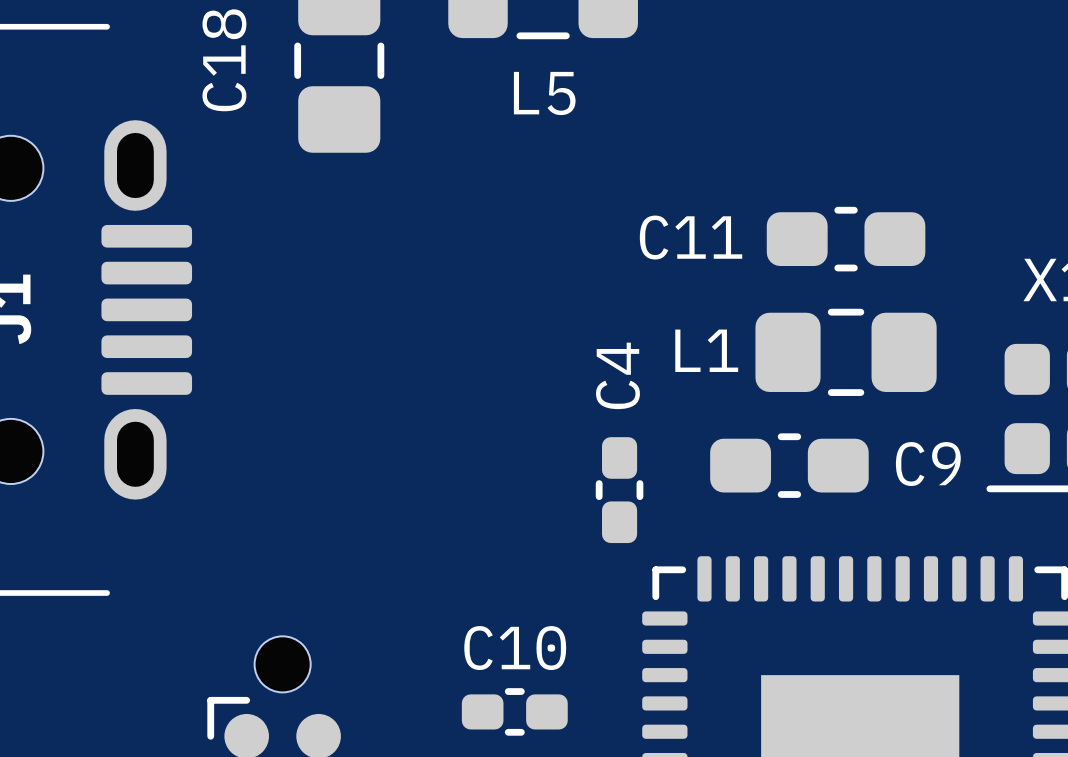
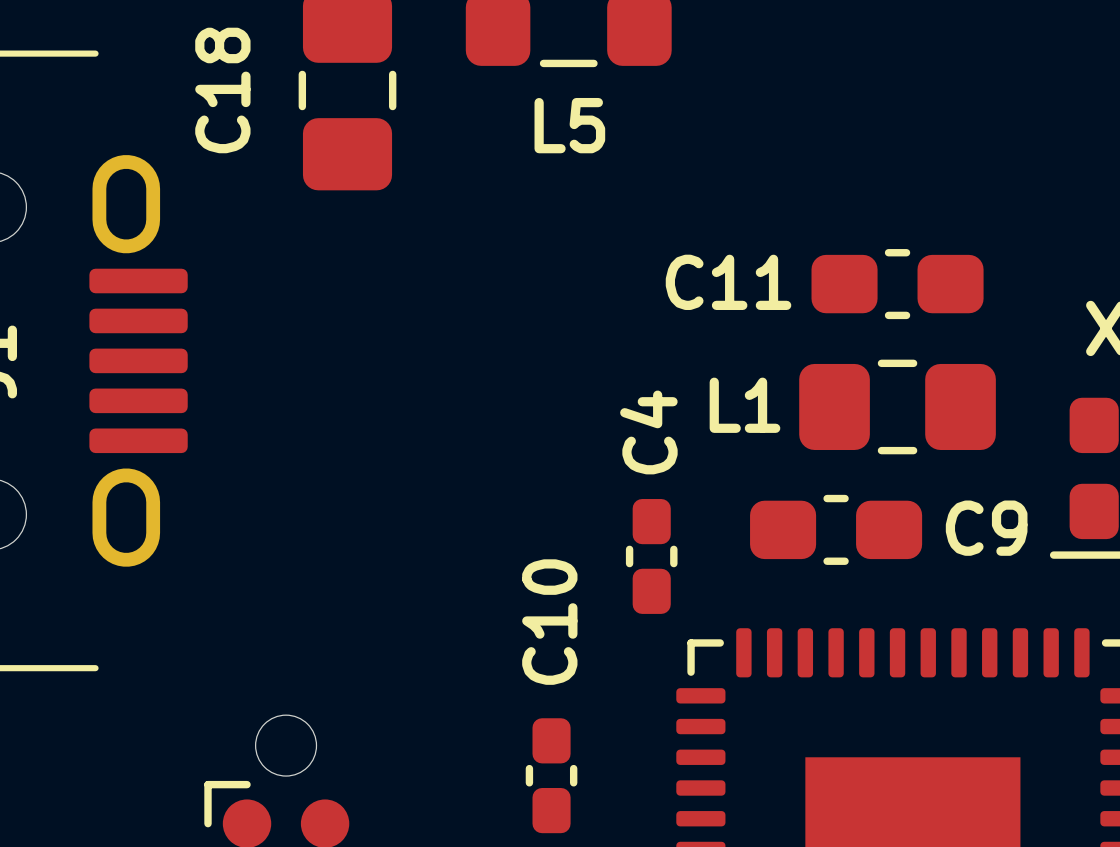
C10 rotation: 0° (514, 711) -> 90° clockwise (551, 775)

